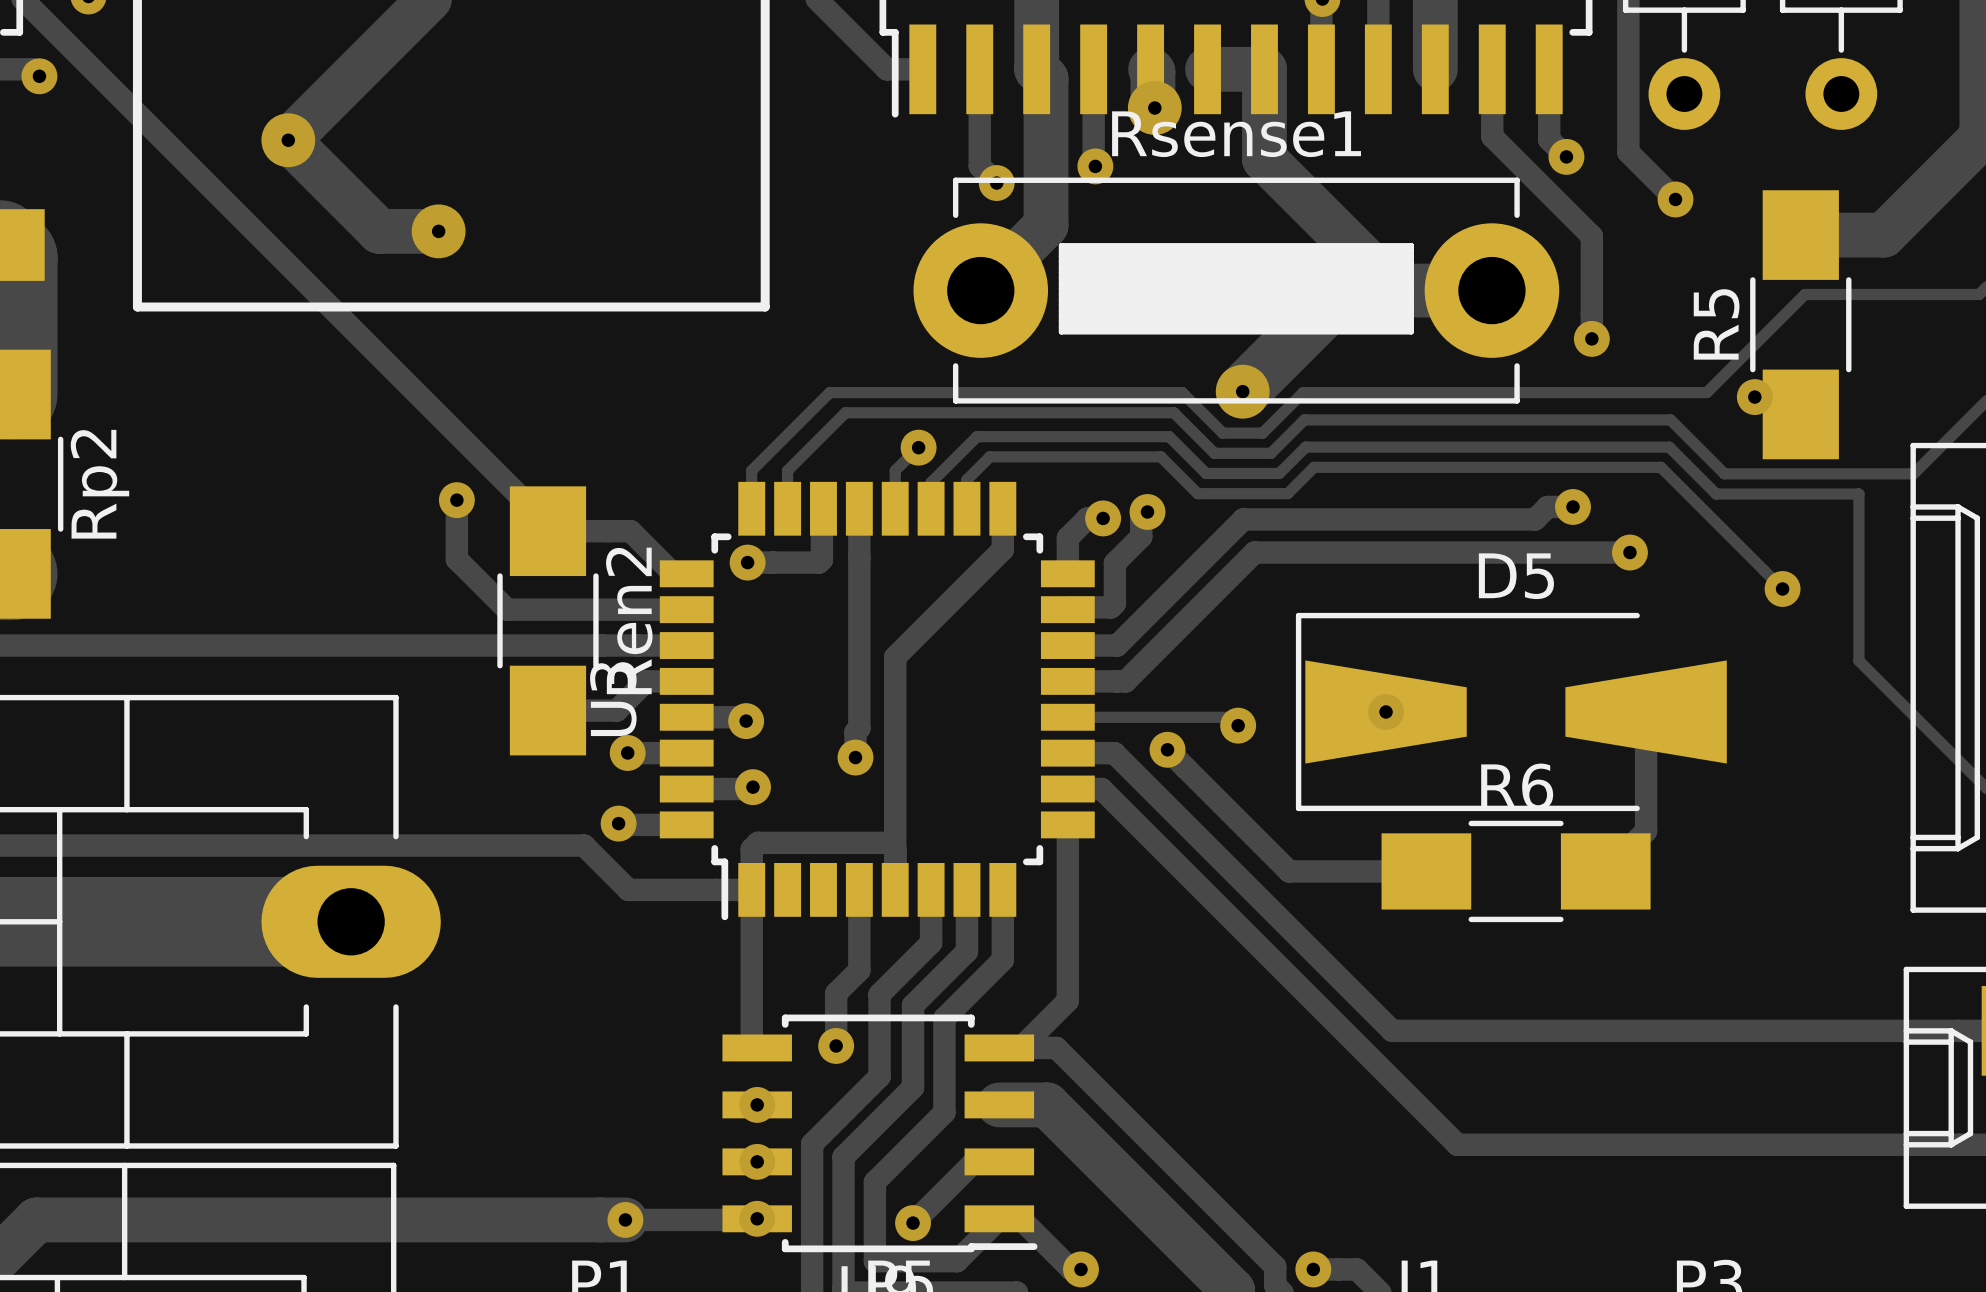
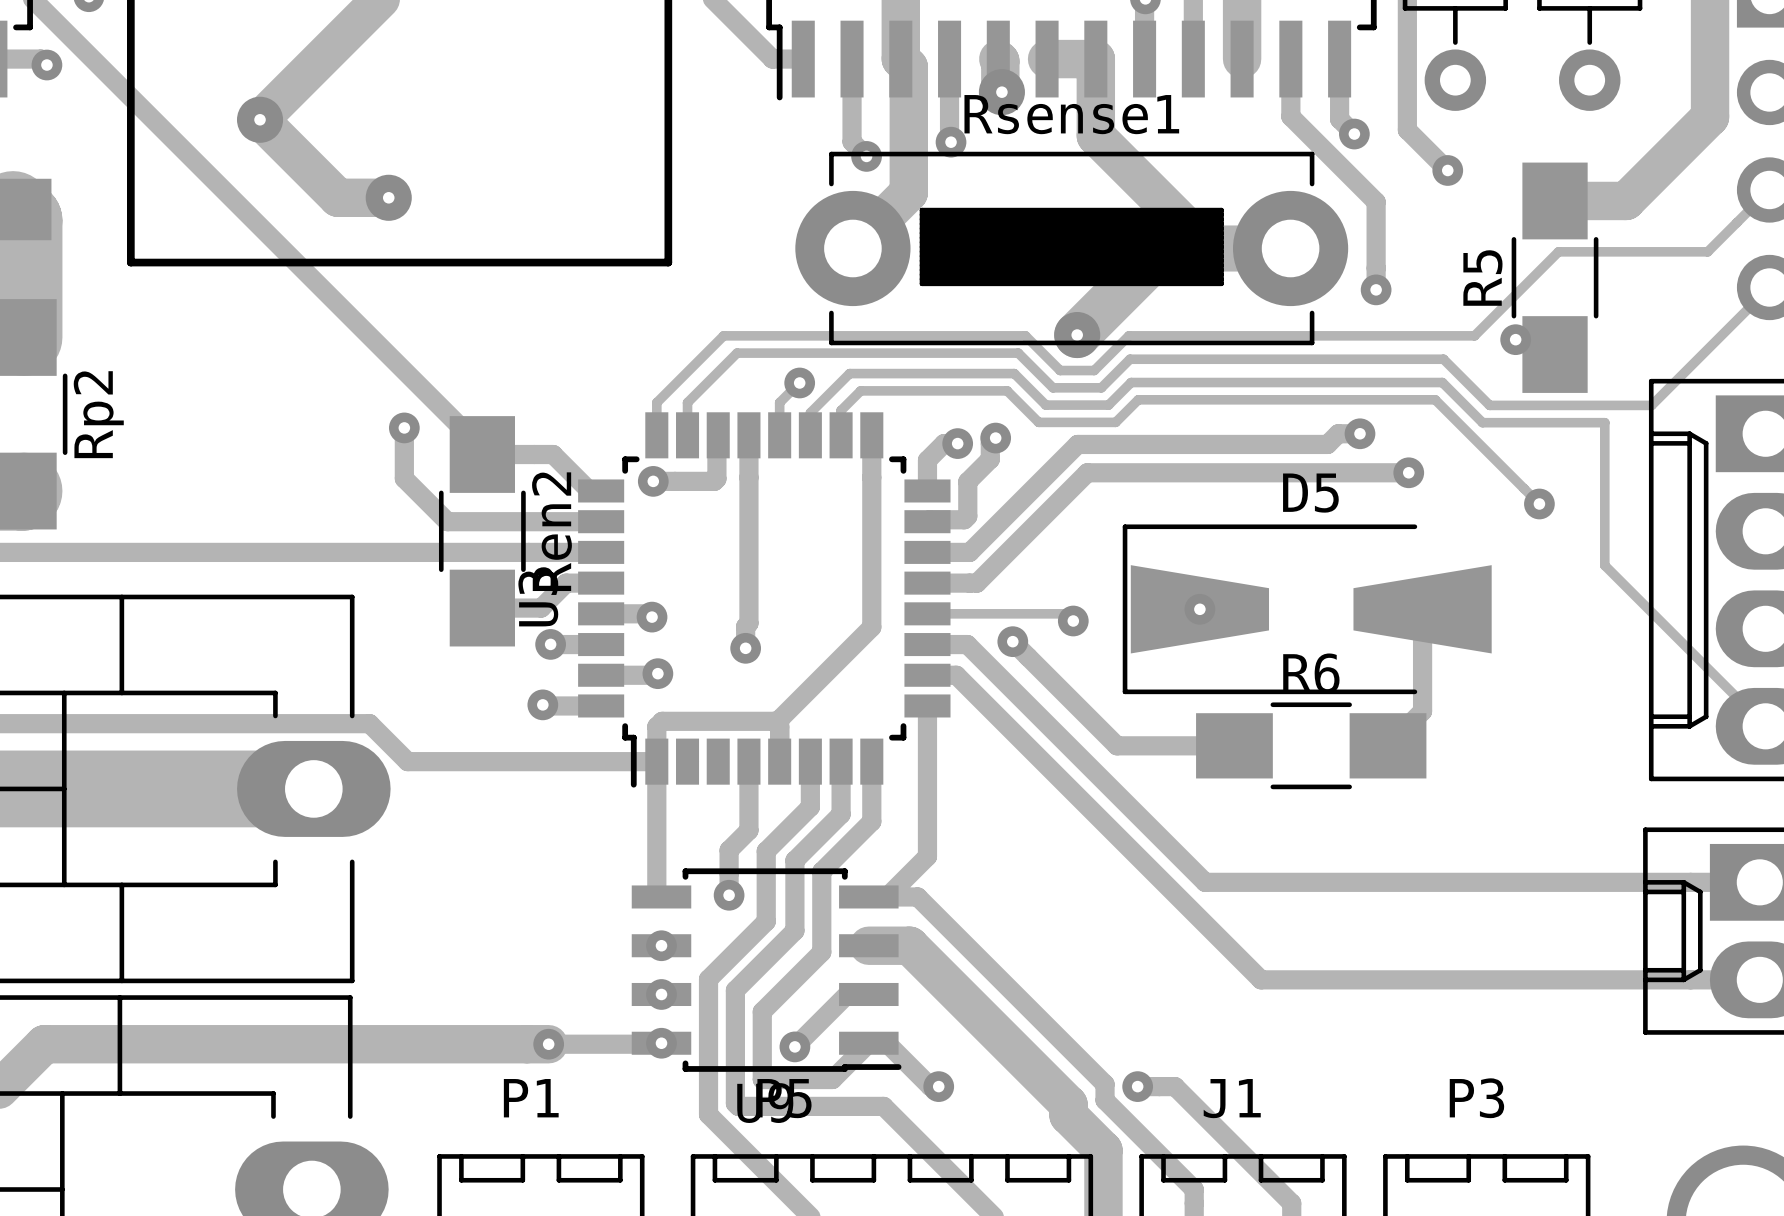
track: (1002, 549) (895, 657) (895, 840) -> (871, 470) (871, 627) (779, 719)
track: (416, 845) (584, 845) (628, 889) -> (369, 723) (407, 761) (551, 761)

